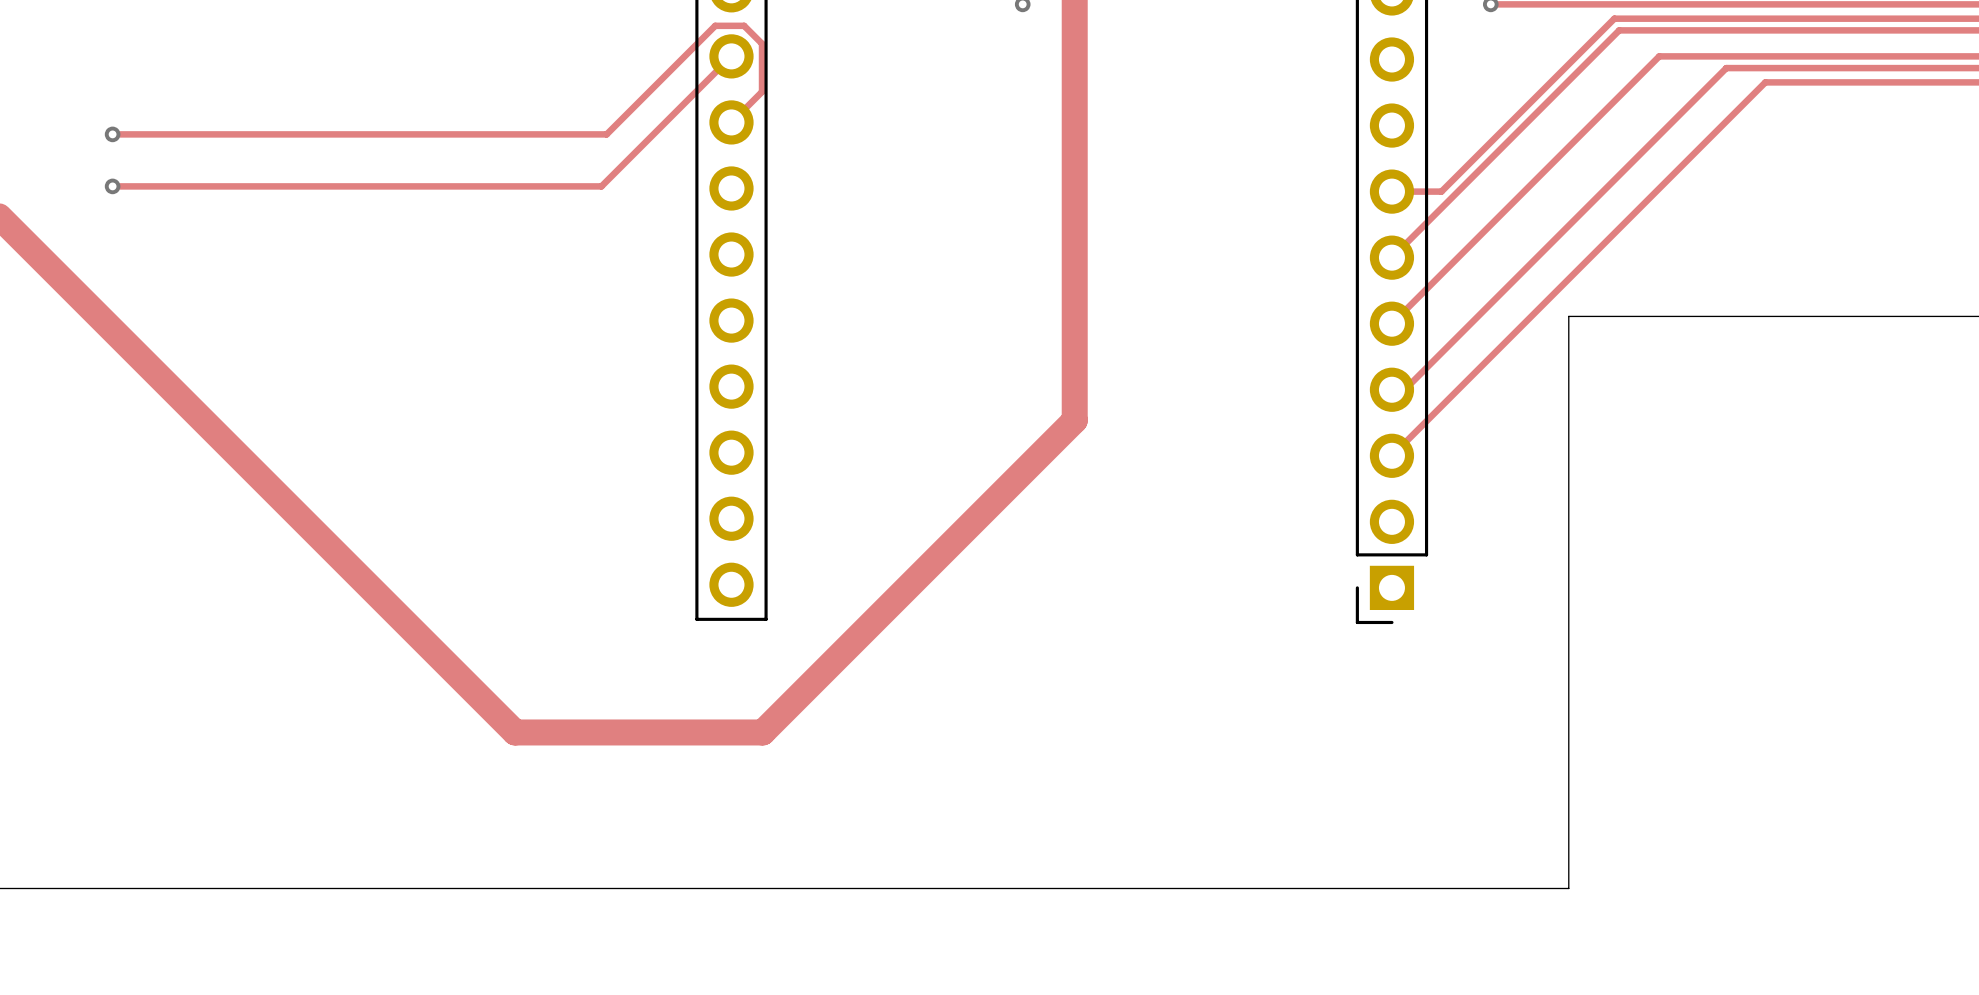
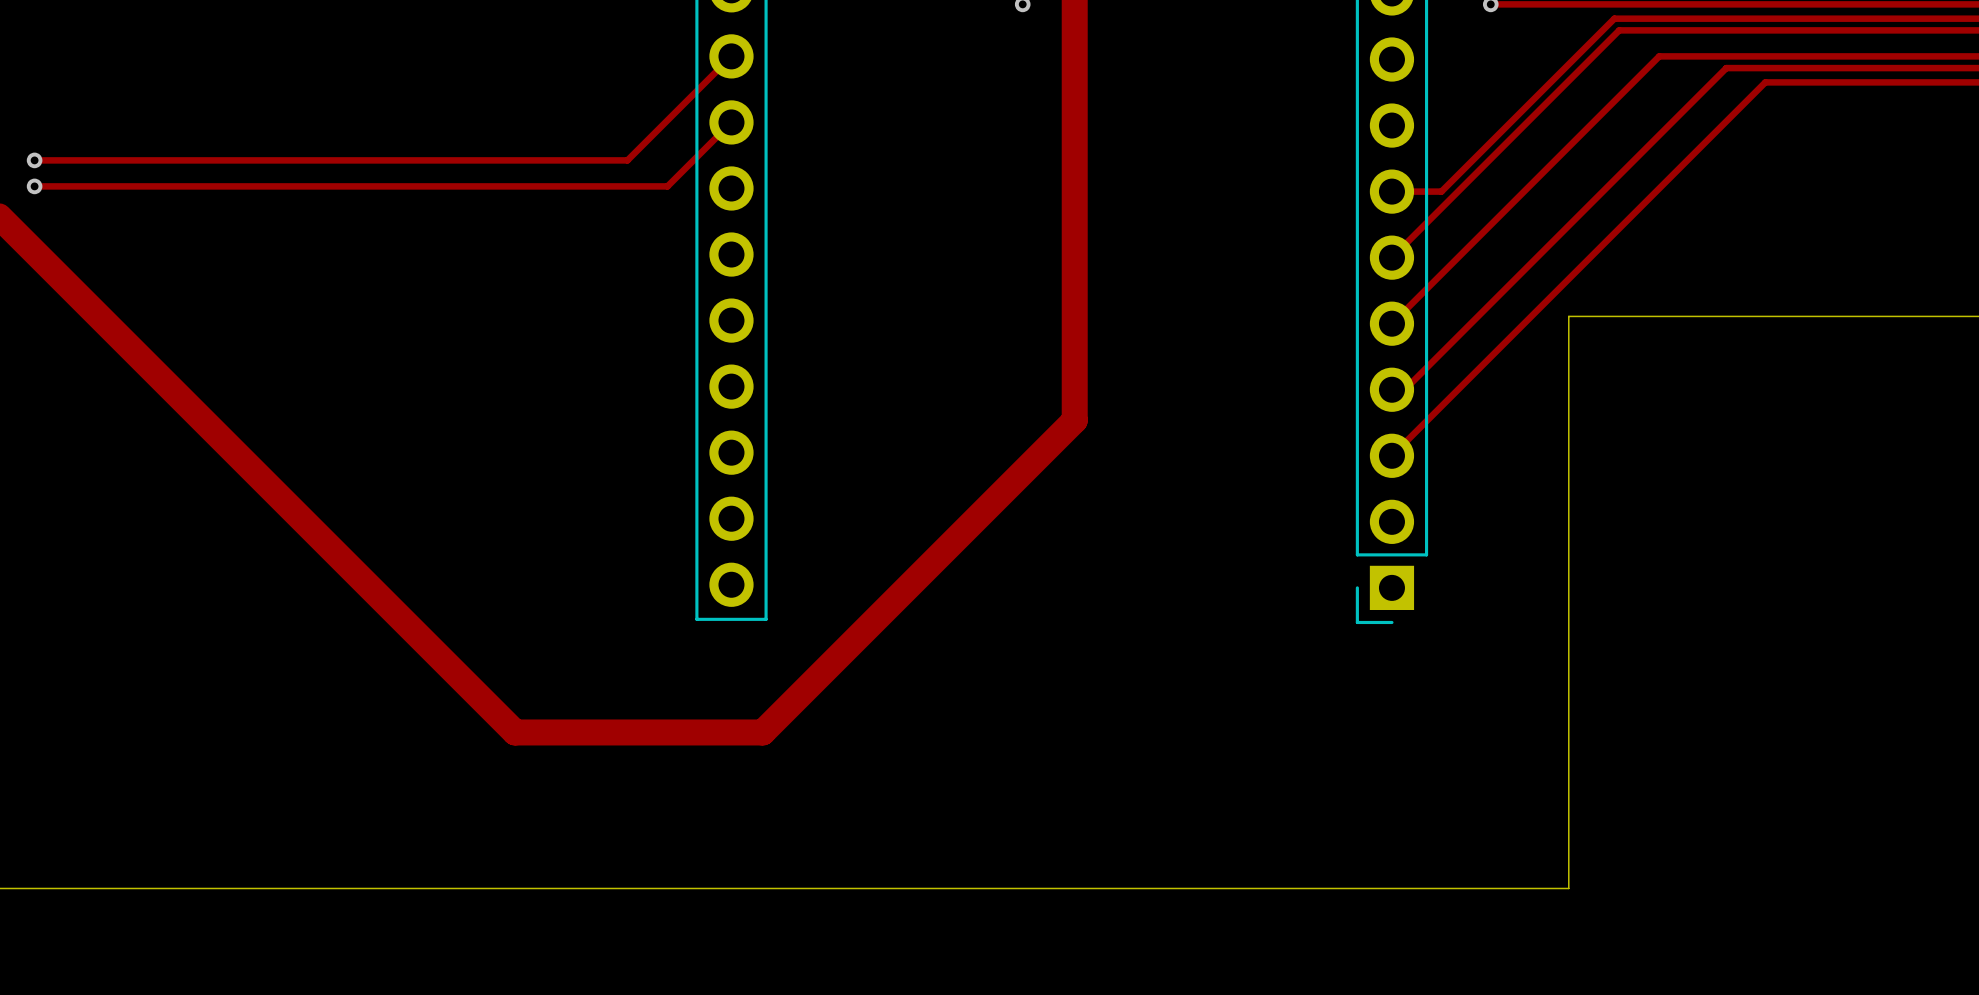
track: (731, 122) (762, 91) (762, 43) (744, 25) (715, 25) (606, 134) (112, 134) -> none
via: (112, 134) -> none
track: none -> (34, 160) (627, 160)
via: none -> (34, 160)
track: (627, 160) (601, 186) -> (731, 122) (667, 186) (601, 186)
track: none -> (34, 186) (112, 186)
via: none -> (34, 186)
via: (112, 186) -> none

